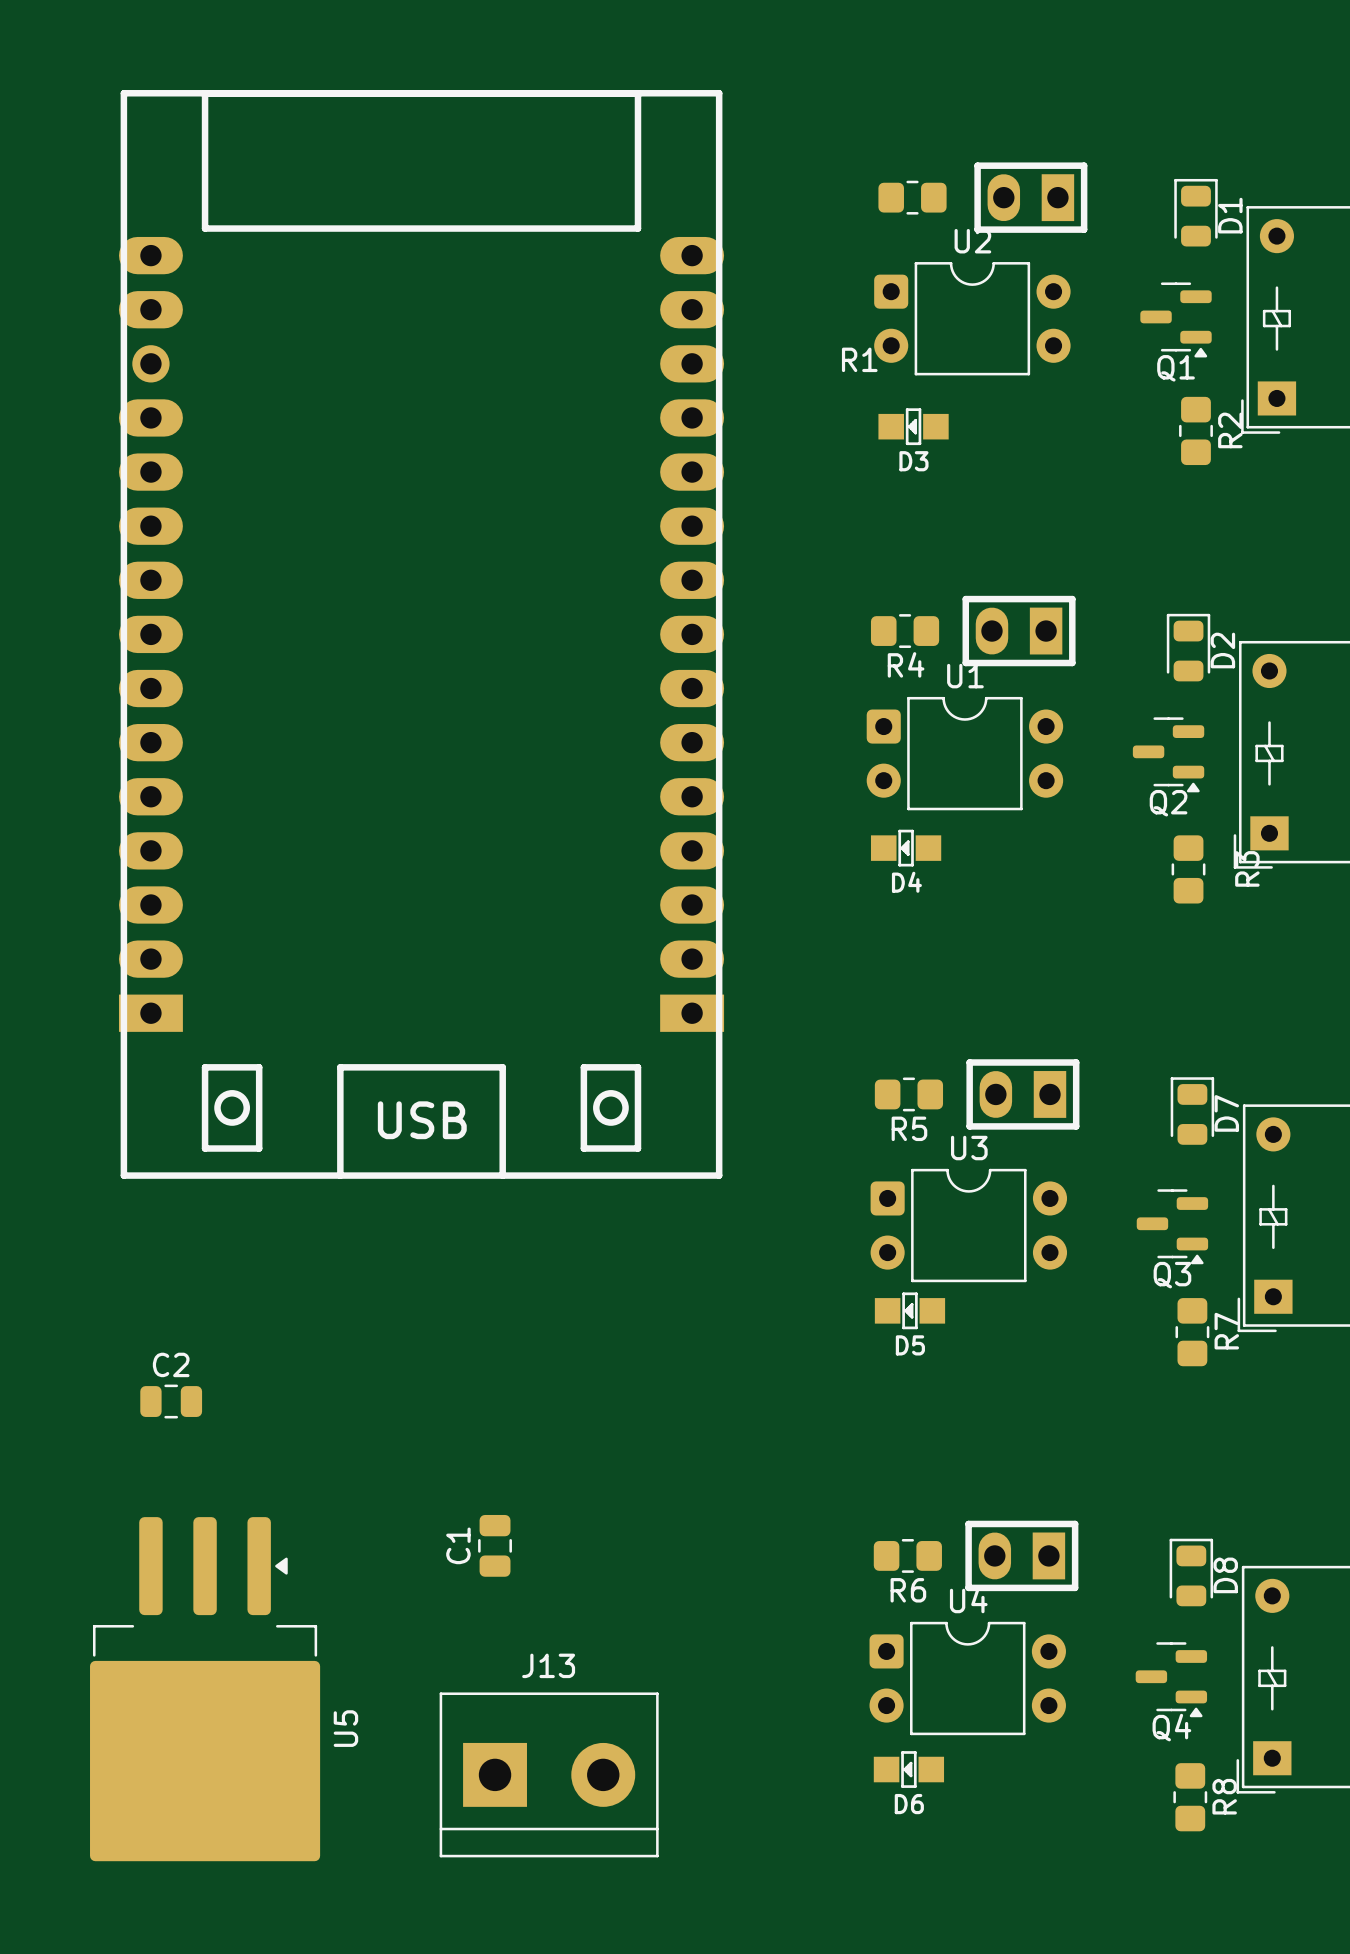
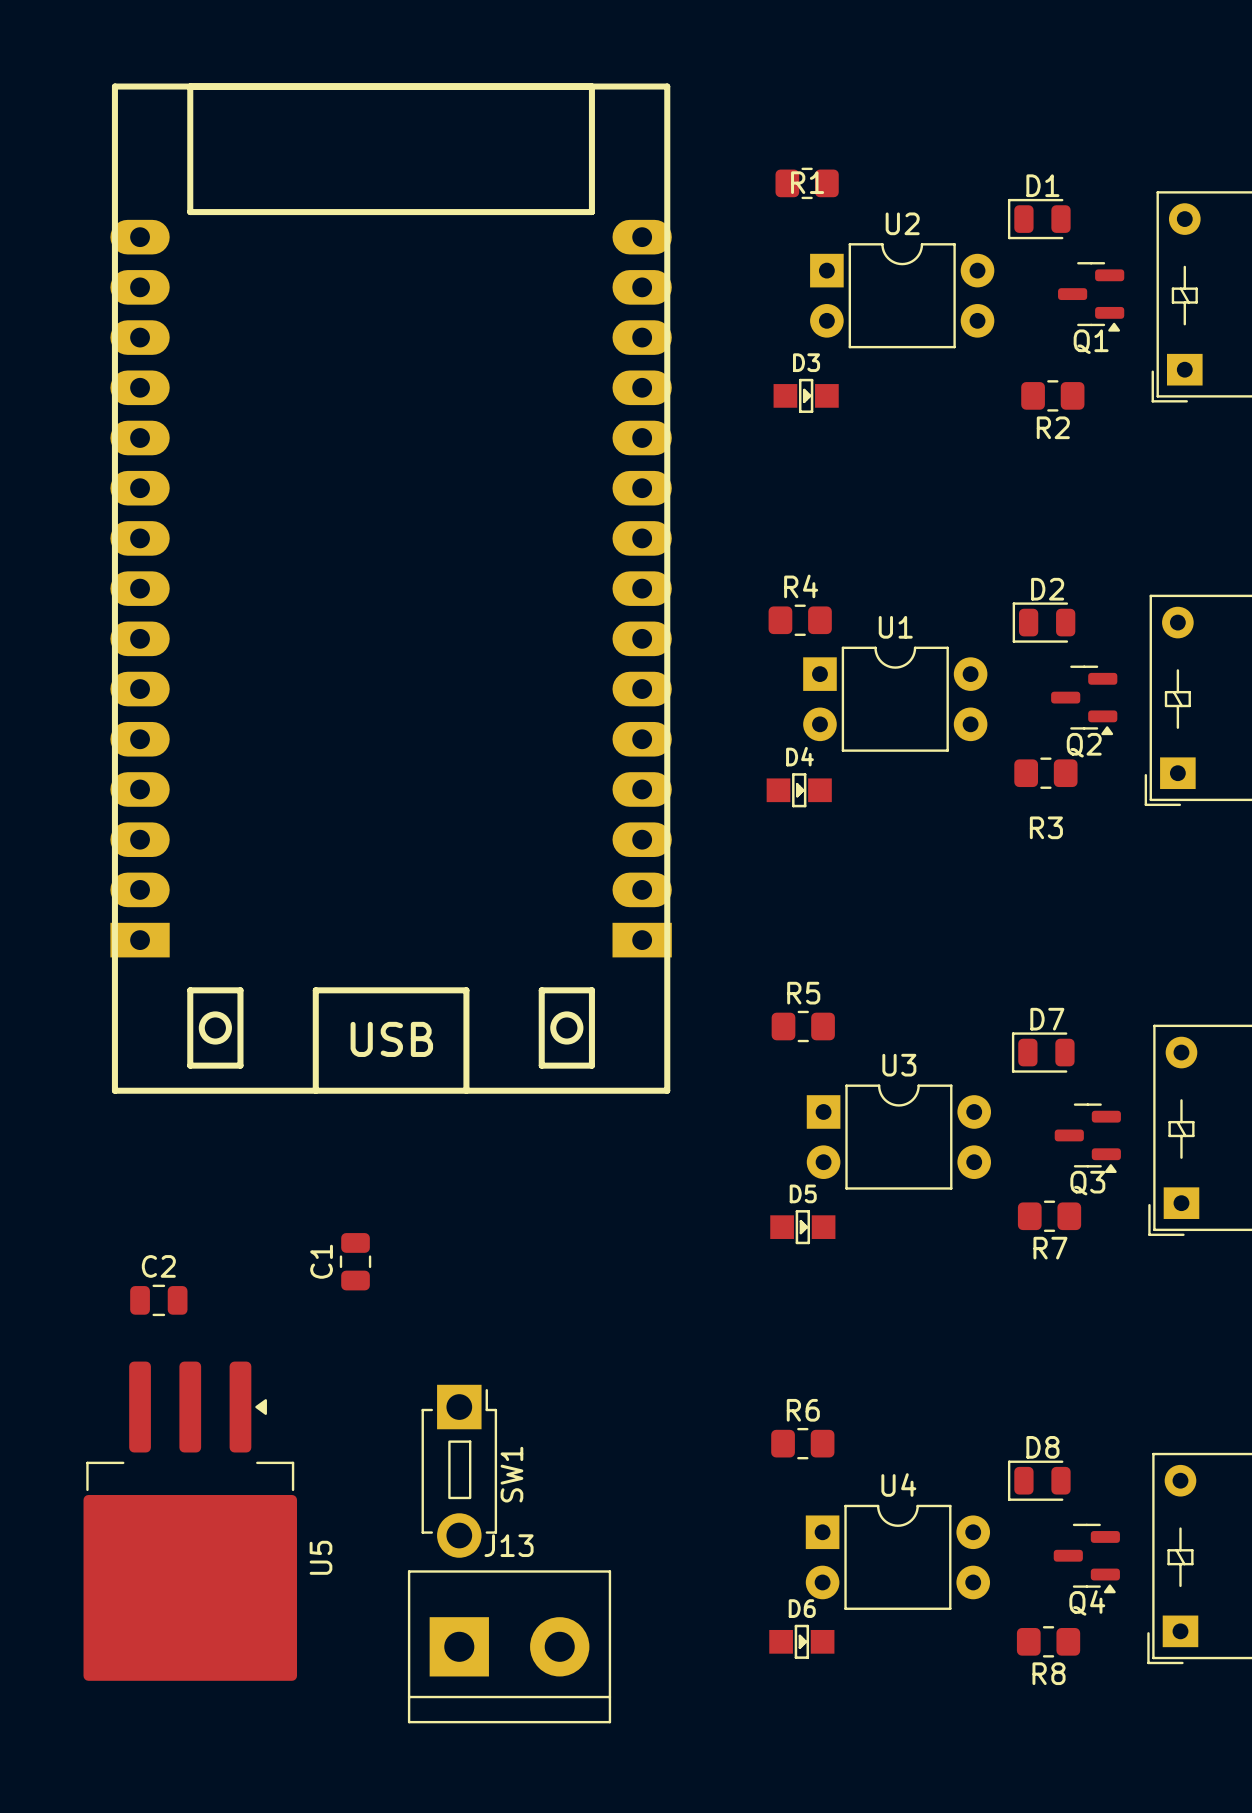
part footprint: [118, 90, 725, 1179] -> [110, 83, 672, 1094]
R1 position: (912, 197) -> (807, 183)
part: (1030, 197) -> none
D1 rotation: 0° (1195, 212) -> 90° counterclockwise (1039, 219)
D1 position: (1195, 212) -> (1039, 219)
U2 footprint: [874, 262, 1071, 376] -> [810, 243, 995, 349]
R1 name position: R1 (859, 359) -> R1 (807, 182)
D3 rotation: 0° (913, 426) -> 180° (806, 395)
D3 position: (913, 426) -> (806, 395)
R2 rotation: 0° (1195, 430) -> 90° clockwise (1052, 395)
R2 position: (1195, 430) -> (1052, 395)
R4 position: (905, 631) -> (800, 620)
part: (1019, 631) -> none
D2 rotation: 0° (1188, 647) -> 90° counterclockwise (1043, 622)
D2 position: (1188, 647) -> (1043, 622)
R4 name position: R4 (906, 664) -> R4 (801, 586)
U1 footprint: [866, 696, 1064, 811] -> [803, 646, 988, 752]
D4 rotation: 0° (906, 848) -> 180° (799, 790)
D4 position: (906, 848) -> (799, 790)
R3 rotation: 0° (1188, 869) -> 90° clockwise (1045, 773)
R3 position: (1188, 869) -> (1045, 773)
R5 position: (908, 1094) -> (803, 1026)
part: (1022, 1094) -> none
D7 rotation: 0° (1192, 1111) -> 90° counterclockwise (1043, 1052)
D7 position: (1192, 1111) -> (1043, 1052)
R5 name position: R5 (909, 1128) -> R5 (803, 993)
U3 footprint: [870, 1168, 1068, 1283] -> [806, 1084, 992, 1190]
D5 footprint: [874, 1292, 946, 1330] -> [770, 1210, 836, 1245]
R7 rotation: 0° (1192, 1332) -> 90° clockwise (1049, 1216)
R7 position: (1192, 1332) -> (1049, 1216)
D5 name position: D5 (910, 1345) -> D5 (803, 1193)
C1 position: (495, 1545) -> (355, 1261)
R6 position: (907, 1555) -> (802, 1443)
part: (1021, 1555) -> none
D8 rotation: 0° (1191, 1572) -> 90° counterclockwise (1039, 1480)
D8 position: (1191, 1572) -> (1039, 1480)
SW1: none -> (459, 1471)
R6 name position: R6 (908, 1590) -> R6 (803, 1410)
U4 footprint: [869, 1621, 1066, 1736] -> [805, 1504, 991, 1610]
U5 position: (205, 1689) -> (190, 1521)
D6 footprint: [873, 1751, 945, 1788] -> [769, 1624, 835, 1659]
R8 rotation: 0° (1190, 1797) -> 90° clockwise (1048, 1641)
R8 position: (1190, 1797) -> (1048, 1641)
D6 name position: D6 (909, 1804) -> D6 (802, 1608)

